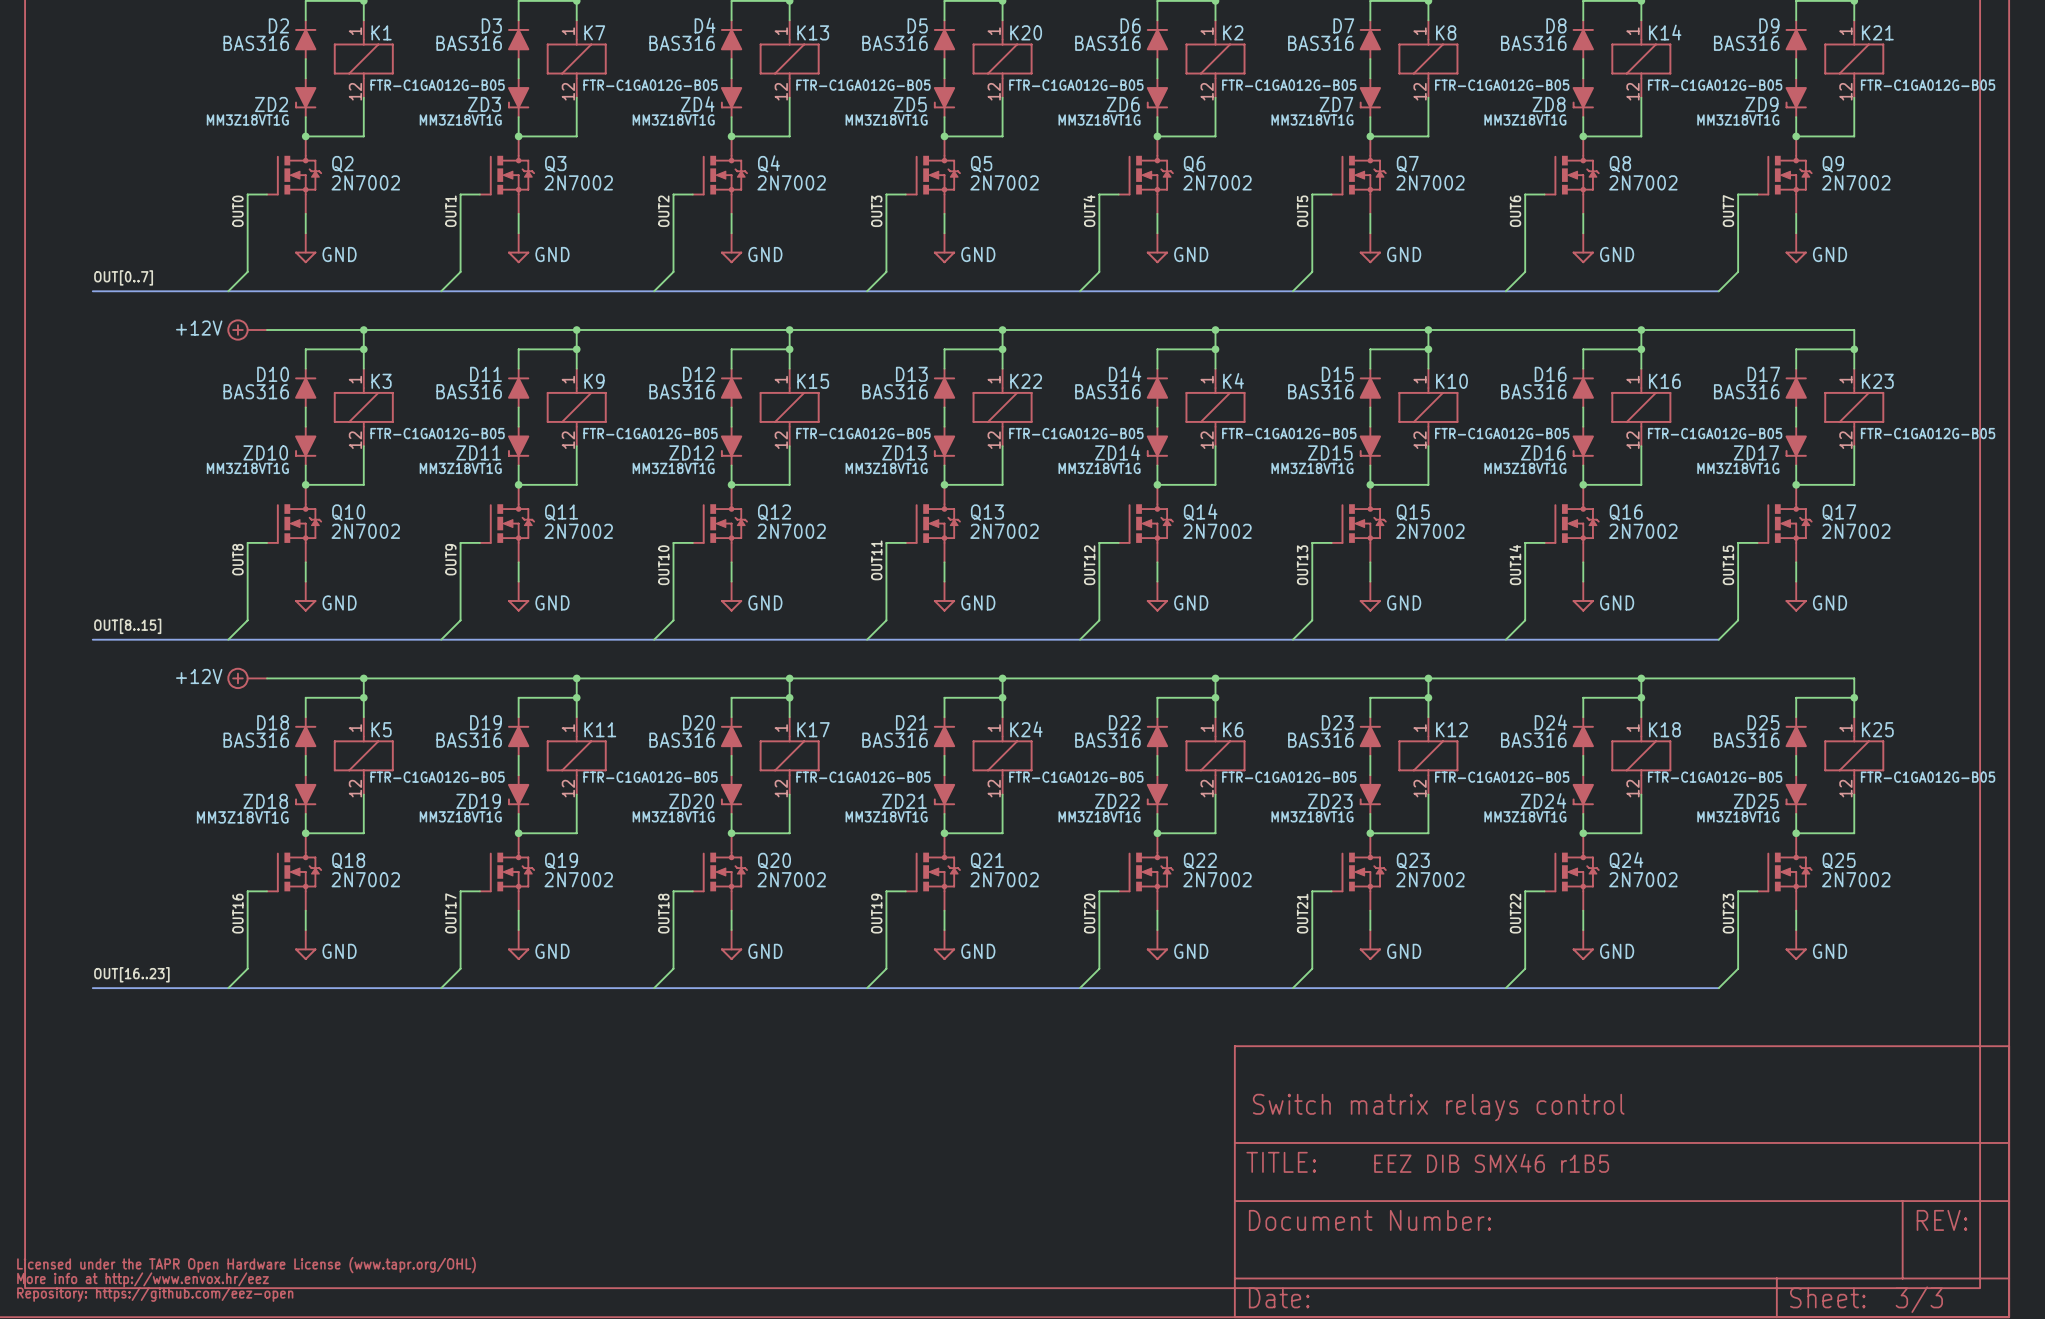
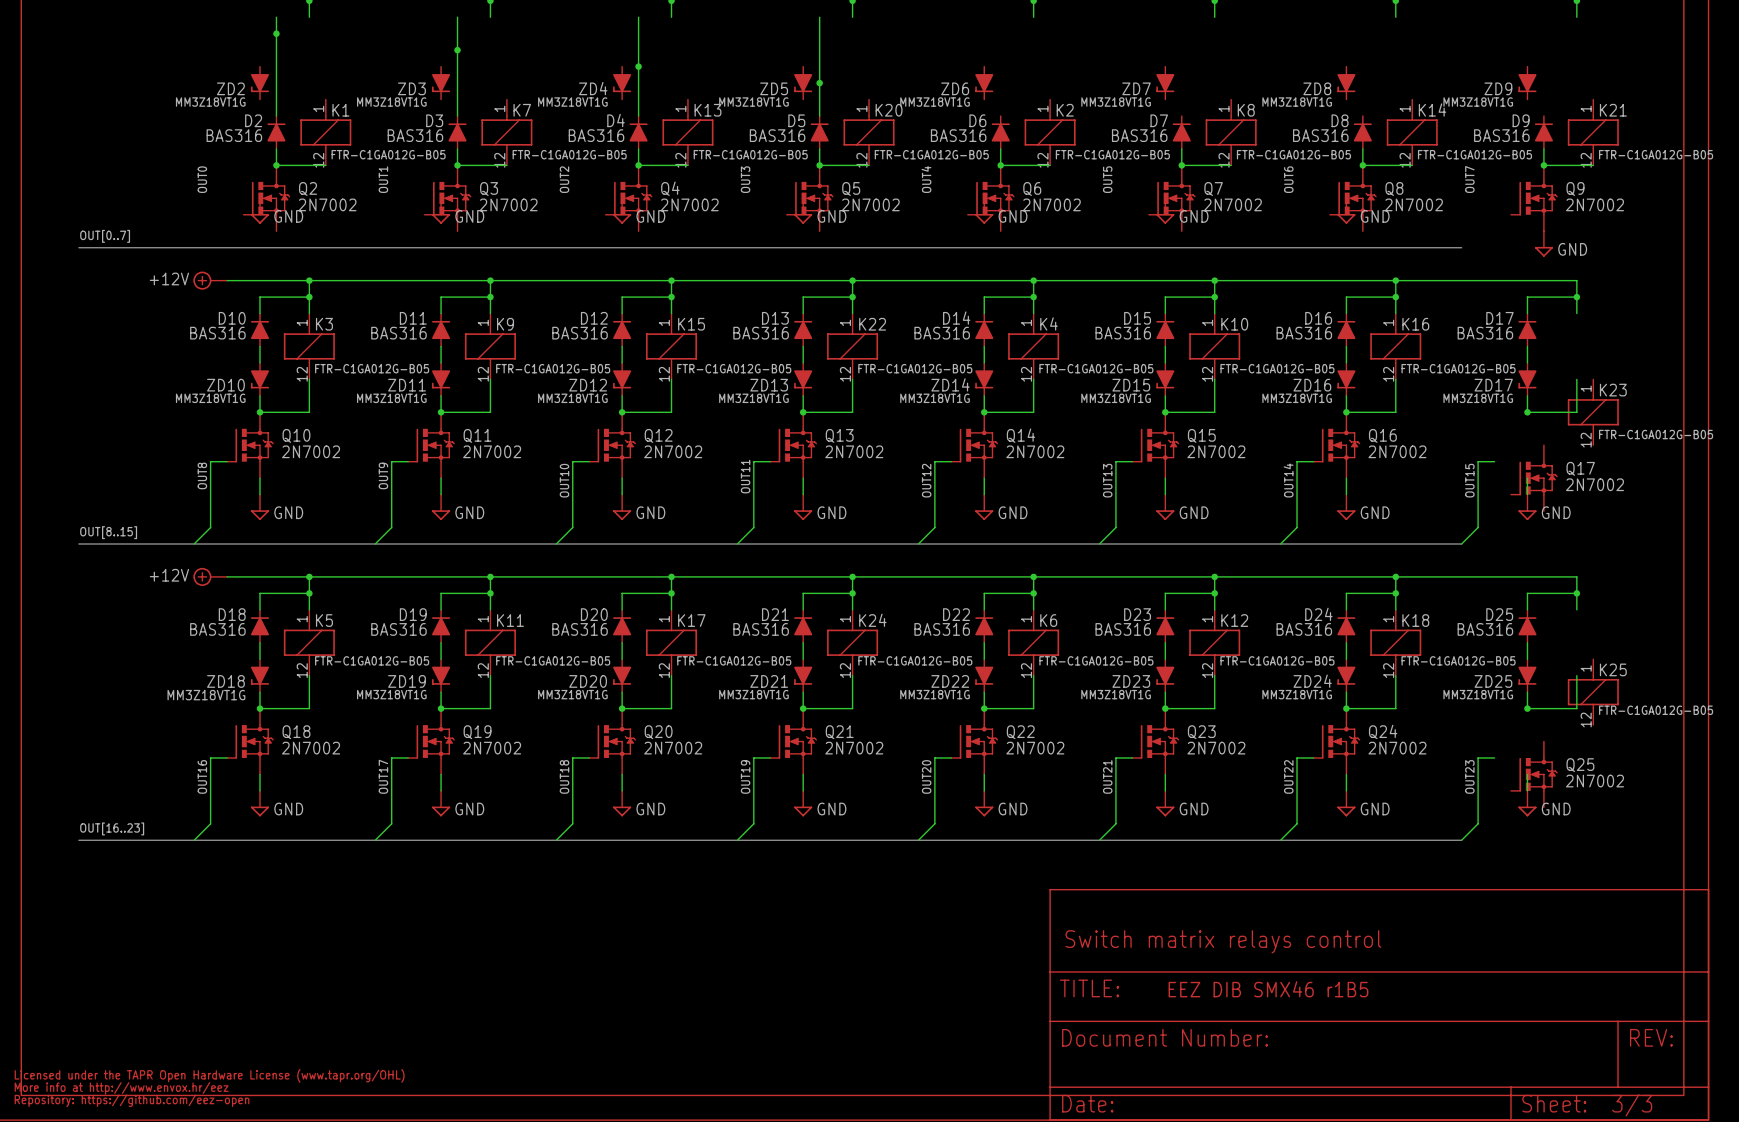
wire: (363, 0) (305, 0) (305, 20) -> none
wire: (576, 0) (518, 0) (518, 20) -> none
wire: (789, 0) (731, 0) (731, 20) -> none
wire: (1002, 0) (944, 0) (944, 20) -> none
wire: (1215, 0) (1157, 0) (1157, 20) -> none
wire: (1428, 0) (1370, 0) (1370, 20) -> none
wire: (1641, 0) (1583, 0) (1583, 20) -> none
wire: (1854, 0) (1796, 0) (1796, 20) -> none
wire: none -> (276, 17) (276, 116)
wire: none -> (457, 17) (457, 116)
wire: none -> (638, 17) (638, 116)
wire: none -> (819, 17) (819, 116)
D2 position: (305, 39) -> (276, 132)
junction: none -> (276, 33)
D3 position: (518, 39) -> (457, 132)
D4 position: (731, 39) -> (638, 132)
D5 position: (944, 39) -> (819, 132)
D6 position: (1157, 39) -> (1000, 132)
D7 position: (1370, 39) -> (1181, 132)
D8 position: (1583, 39) -> (1362, 132)
D9 position: (1796, 39) -> (1543, 132)
wire: (305, 59) (305, 78) -> none
K1 position: (363, 59) -> (325, 132)
wire: (518, 59) (518, 78) -> none
junction: none -> (457, 50)
K7 position: (576, 59) -> (506, 132)
wire: (731, 59) (731, 78) -> none
K13 position: (789, 59) -> (687, 132)
wire: (944, 59) (944, 78) -> none
K20 position: (1002, 59) -> (869, 132)
wire: (1157, 59) (1157, 78) -> none
K2 position: (1215, 59) -> (1050, 132)
wire: (1370, 59) (1370, 78) -> none
K8 position: (1428, 59) -> (1231, 132)
wire: (1583, 59) (1583, 78) -> none
K14 position: (1641, 59) -> (1412, 132)
wire: (1796, 59) (1796, 78) -> none
K21 position: (1854, 59) -> (1593, 132)
junction: none -> (638, 66)
wire: (363, 97) (363, 136) (305, 136) (305, 117) -> none
wire: (576, 97) (576, 136) (518, 136) (518, 117) -> none
wire: (789, 97) (789, 136) (731, 136) (731, 117) -> none
junction: none -> (819, 83)
wire: (1002, 97) (1002, 136) (944, 136) (944, 117) -> none
wire: (1215, 97) (1215, 136) (1157, 136) (1157, 117) -> none
wire: (1428, 97) (1428, 136) (1370, 136) (1370, 117) -> none
wire: (1641, 97) (1641, 136) (1583, 136) (1583, 117) -> none
wire: (1854, 97) (1854, 136) (1796, 136) (1796, 117) -> none
junction: (305, 136) -> none
junction: (518, 136) -> none
junction: (731, 136) -> none
junction: (944, 136) -> none
junction: (1157, 136) -> none
junction: (1370, 136) -> none
junction: (1583, 136) -> none
junction: (1796, 136) -> none
Q2 position: (294, 175) -> (266, 198)
wire: none -> (276, 148) (276, 165) (325, 165)
Q3 position: (507, 175) -> (447, 198)
wire: none -> (457, 148) (457, 165) (506, 165)
Q4 position: (719, 175) -> (628, 198)
wire: none -> (638, 148) (638, 165) (687, 165)
Q5 position: (932, 175) -> (809, 198)
wire: none -> (819, 148) (819, 165) (869, 165)
Q6 position: (1145, 175) -> (990, 198)
wire: none -> (1000, 148) (1000, 165) (1050, 165)
Q7 position: (1358, 175) -> (1171, 198)
wire: none -> (1181, 148) (1181, 165) (1231, 165)
Q8 position: (1571, 175) -> (1352, 198)
wire: none -> (1362, 148) (1362, 165) (1412, 165)
Q9 position: (1784, 175) -> (1534, 198)
wire: none -> (1543, 148) (1543, 165) (1593, 165)
wire: (267, 194) (247, 194) (247, 271) (228, 291) -> none
junction: none -> (276, 165)
wire: (479, 194) (460, 194) (460, 271) (441, 291) -> none
junction: none -> (457, 165)
wire: (692, 194) (673, 194) (673, 271) (654, 291) -> none
junction: none -> (638, 165)
wire: (905, 194) (886, 194) (886, 271) (867, 291) -> none
junction: none -> (819, 165)
wire: (1118, 194) (1099, 194) (1099, 271) (1080, 291) -> none
junction: none -> (1000, 165)
wire: (1331, 194) (1312, 194) (1312, 271) (1292, 291) -> none
junction: none -> (1181, 165)
wire: (1544, 194) (1525, 194) (1525, 271) (1505, 291) -> none
junction: none -> (1362, 165)
wire: (1757, 194) (1738, 194) (1738, 271) (1718, 291) -> none
junction: none -> (1543, 165)
power symbol position: GND (1796, 248) -> GND (1543, 244)
K23 position: (1854, 407) -> (1593, 412)
Q17 position: (1784, 523) -> (1534, 478)
K25 position: (1854, 755) -> (1593, 692)
Q25 position: (1784, 871) -> (1534, 774)

